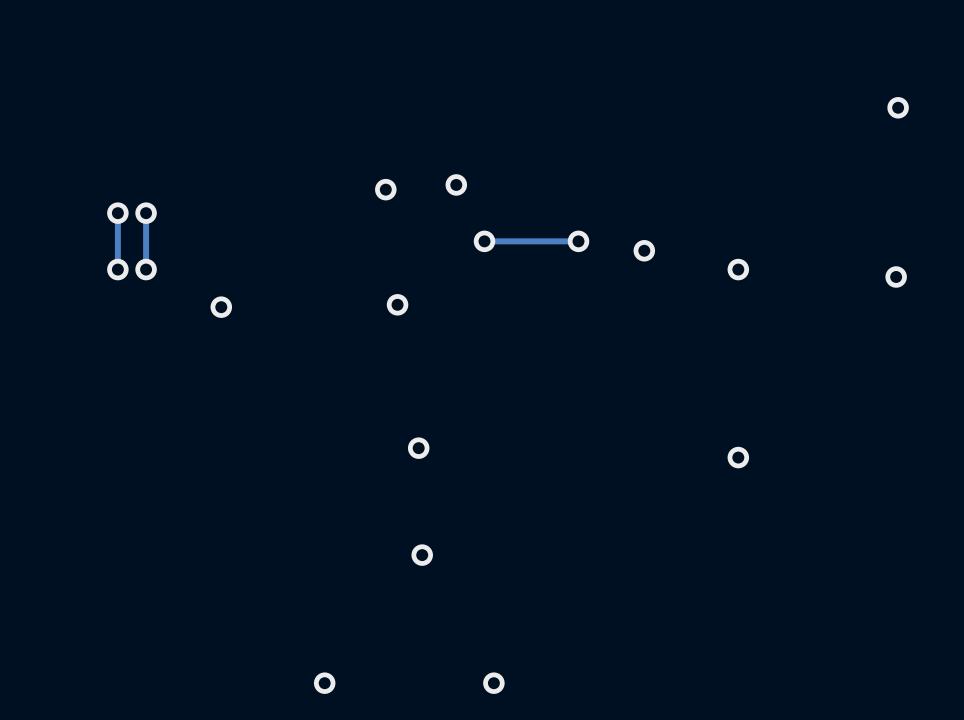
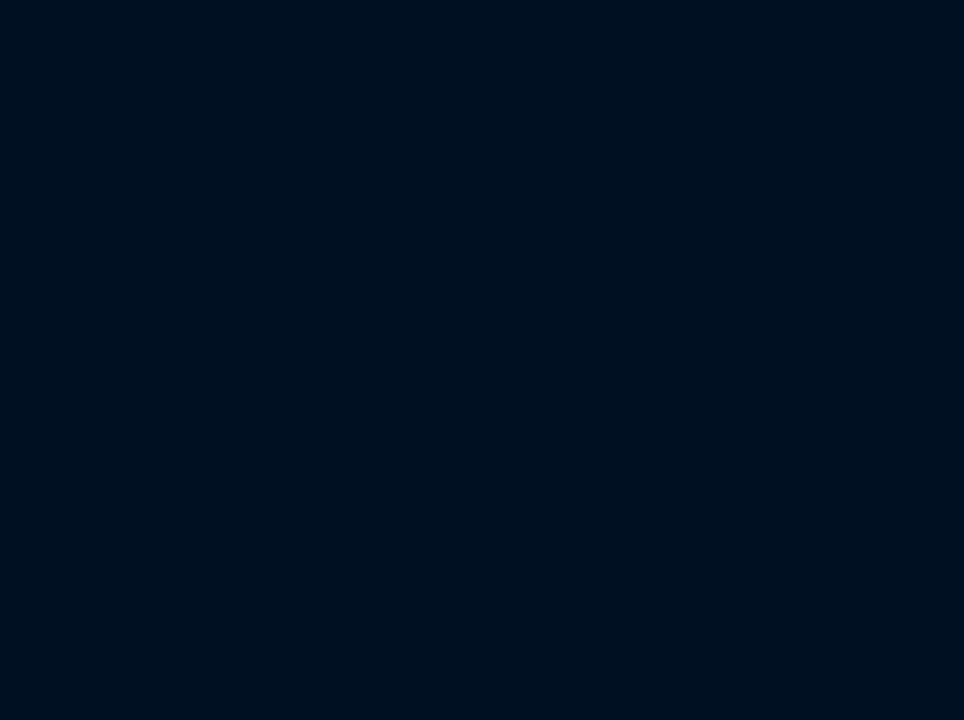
via: (898, 107) -> none
via: (456, 184) -> none
via: (385, 189) -> none
track: (117, 213) (117, 269) -> none
via: (117, 213) -> none
track: (146, 213) (146, 269) -> none
via: (146, 213) -> none
via: (484, 241) -> none
track: (578, 241) (484, 241) -> none
via: (578, 241) -> none
via: (644, 250) -> none
via: (117, 269) -> none
via: (146, 269) -> none
via: (738, 269) -> none
via: (896, 276) -> none
via: (397, 304) -> none
via: (221, 307) -> none
via: (418, 448) -> none
via: (738, 457) -> none
via: (422, 555) -> none
via: (324, 683) -> none
via: (493, 683) -> none

